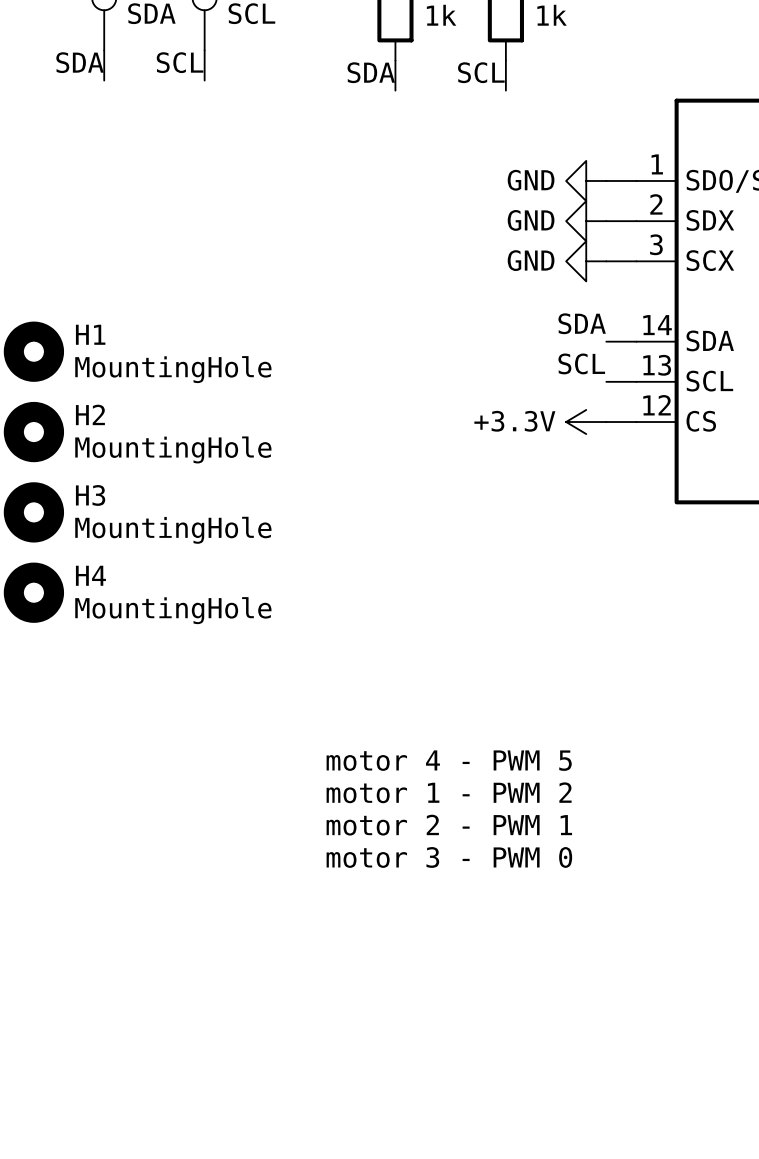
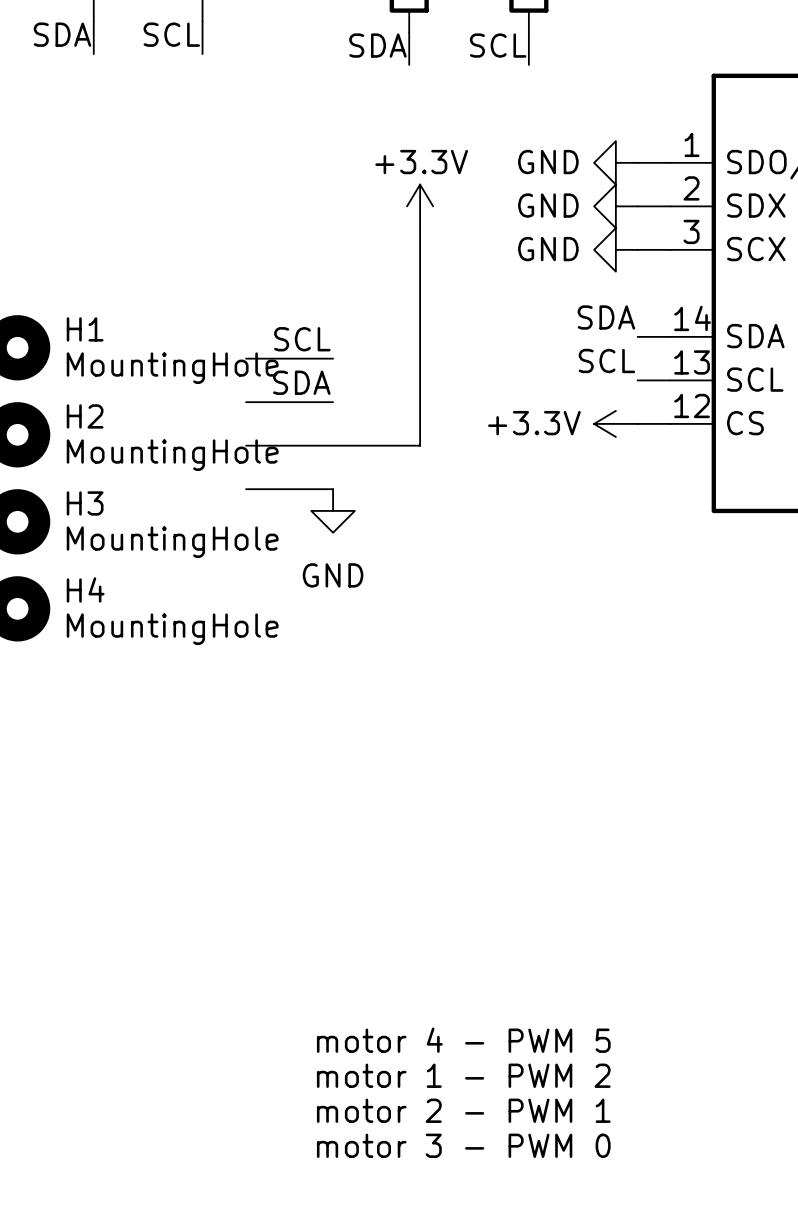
power symbol: none -> +3.3V (420, 206)
wire: none -> (420, 228) (420, 445) (246, 445)
label: none -> SCL (302, 339)
wire: none -> (246, 358) (333, 358)
label: none -> SDA (301, 382)
wire: none -> (246, 402) (333, 402)
wire: none -> (246, 489) (333, 489)
power symbol: none -> GND (333, 510)
text position: motor 4 - PWM 5 (449, 760) -> motor 4 - PWM 5 (463, 1040)
text position: motor 1 - PWM 2 (449, 792) -> motor 1 - PWM 2 (463, 1075)
text position: motor 2 - PWM 1 (449, 825) -> motor 2 - PWM 1 (463, 1110)
text position: motor 3 - PWM 0 (449, 857) -> motor 3 - PWM 0 (463, 1145)

